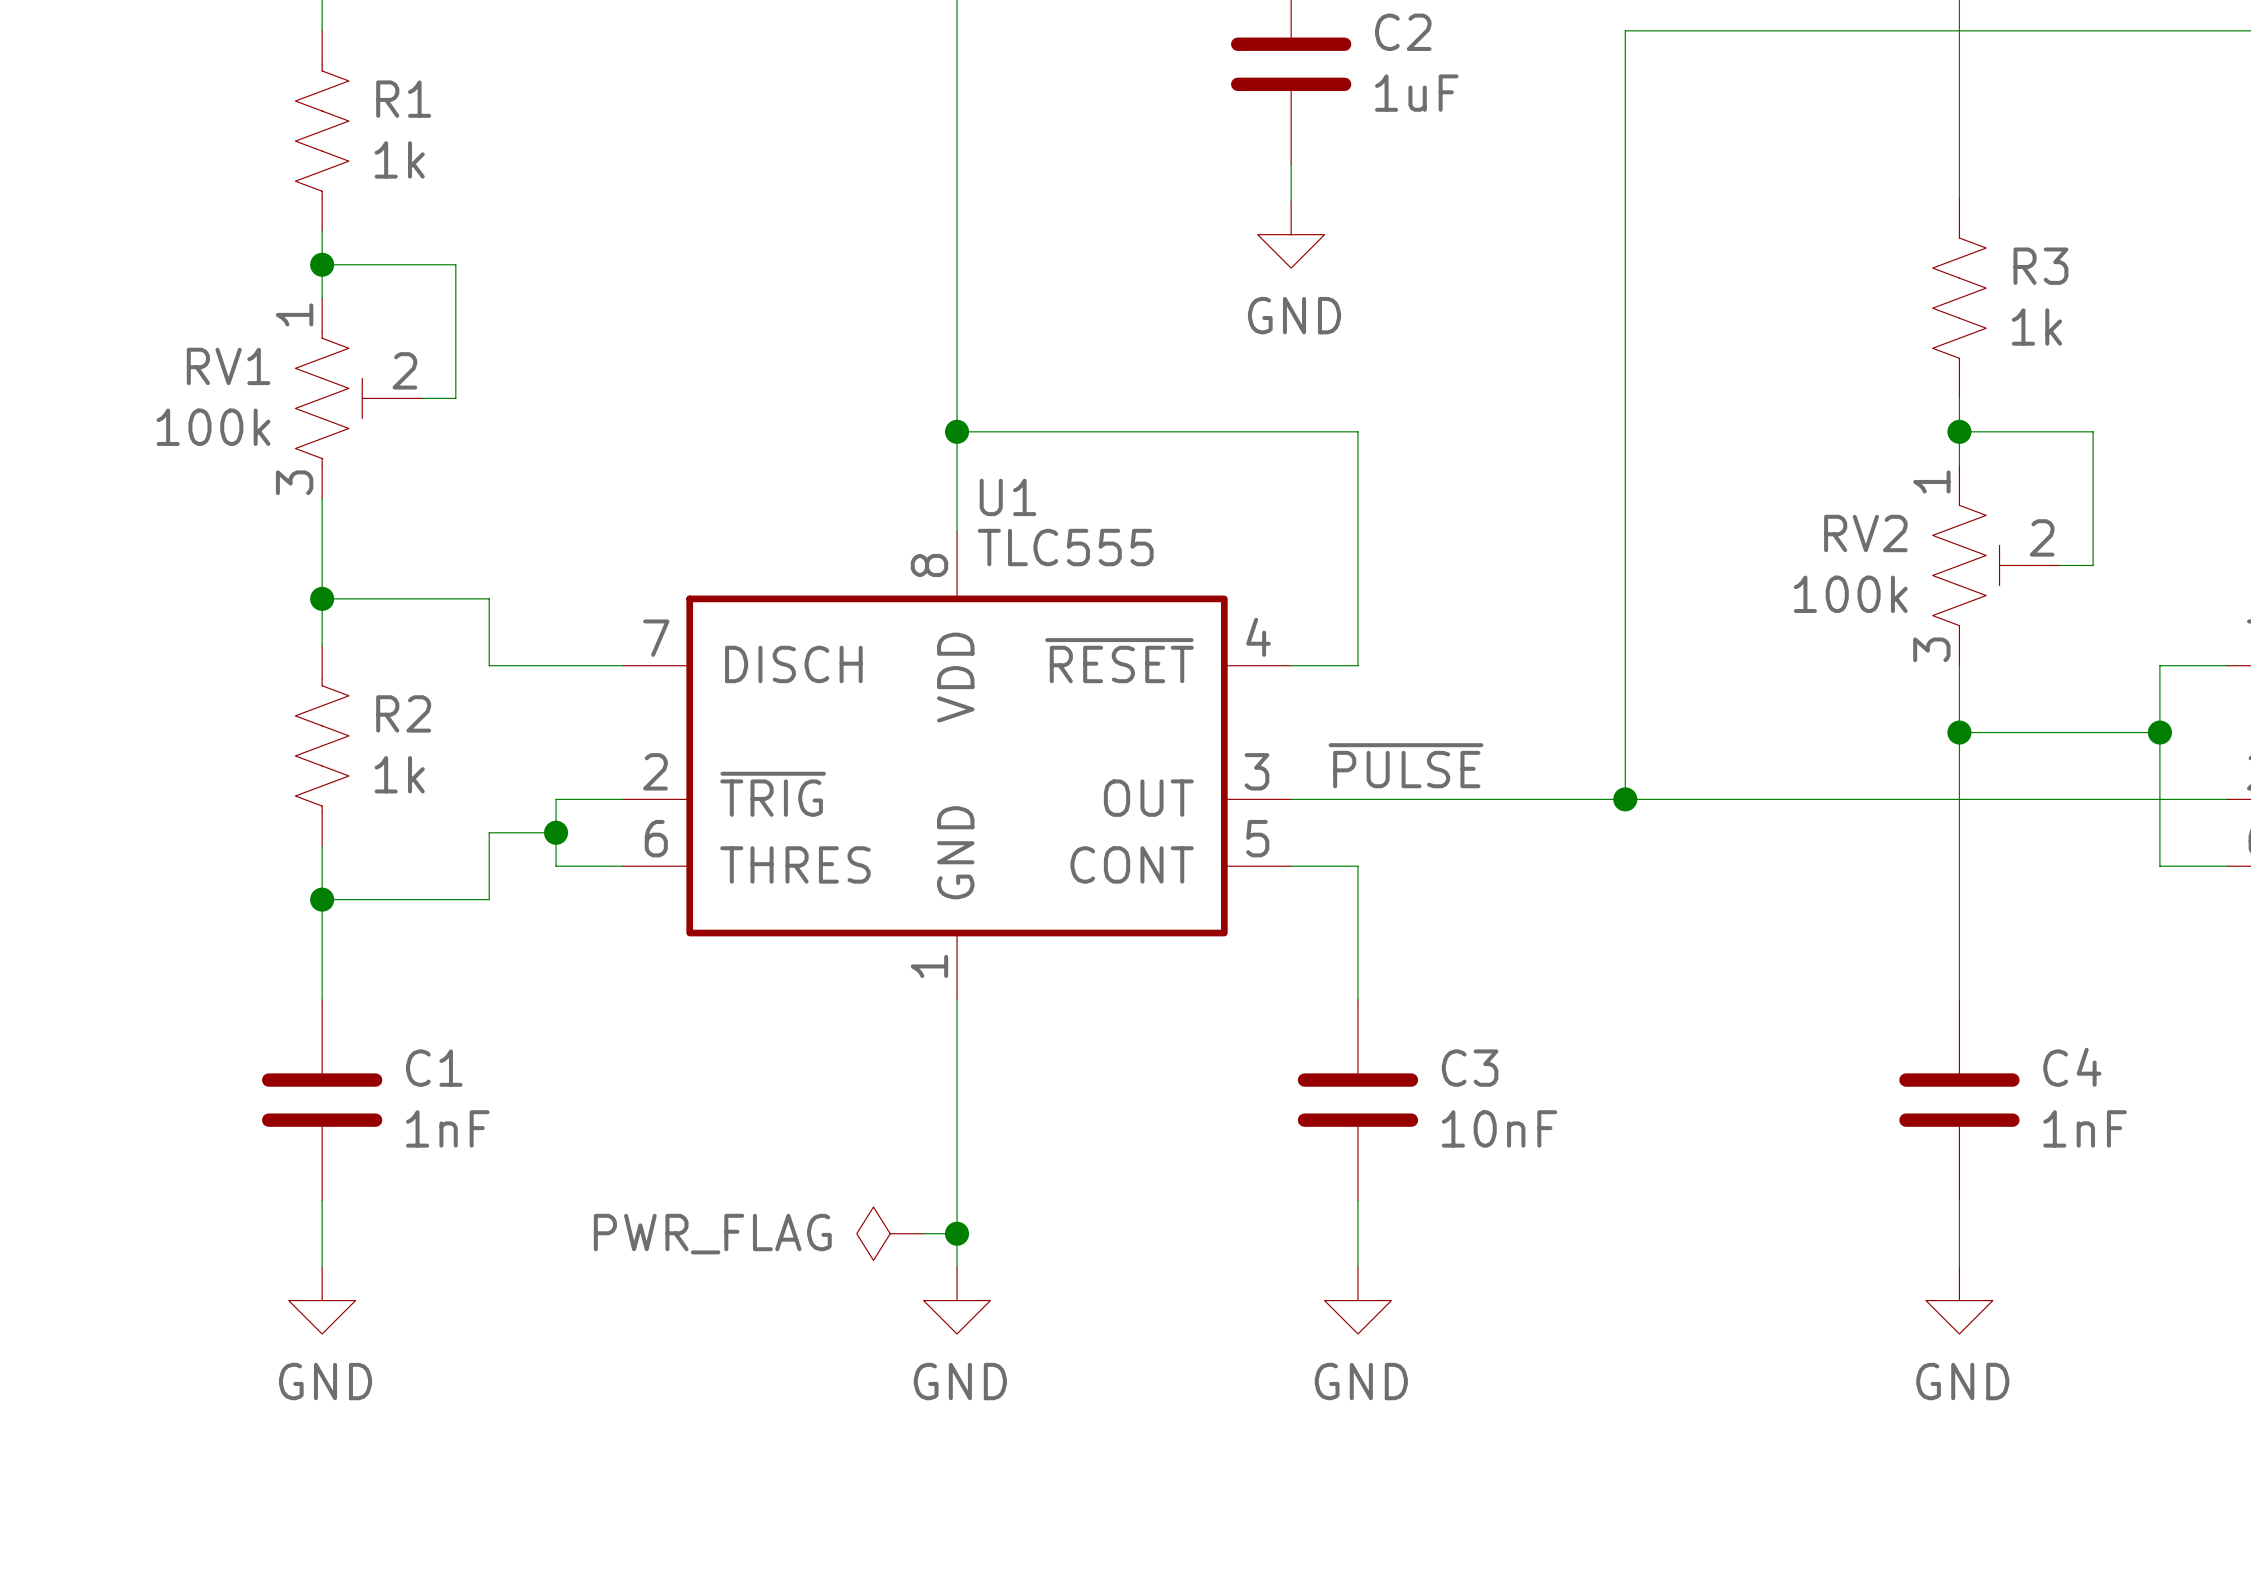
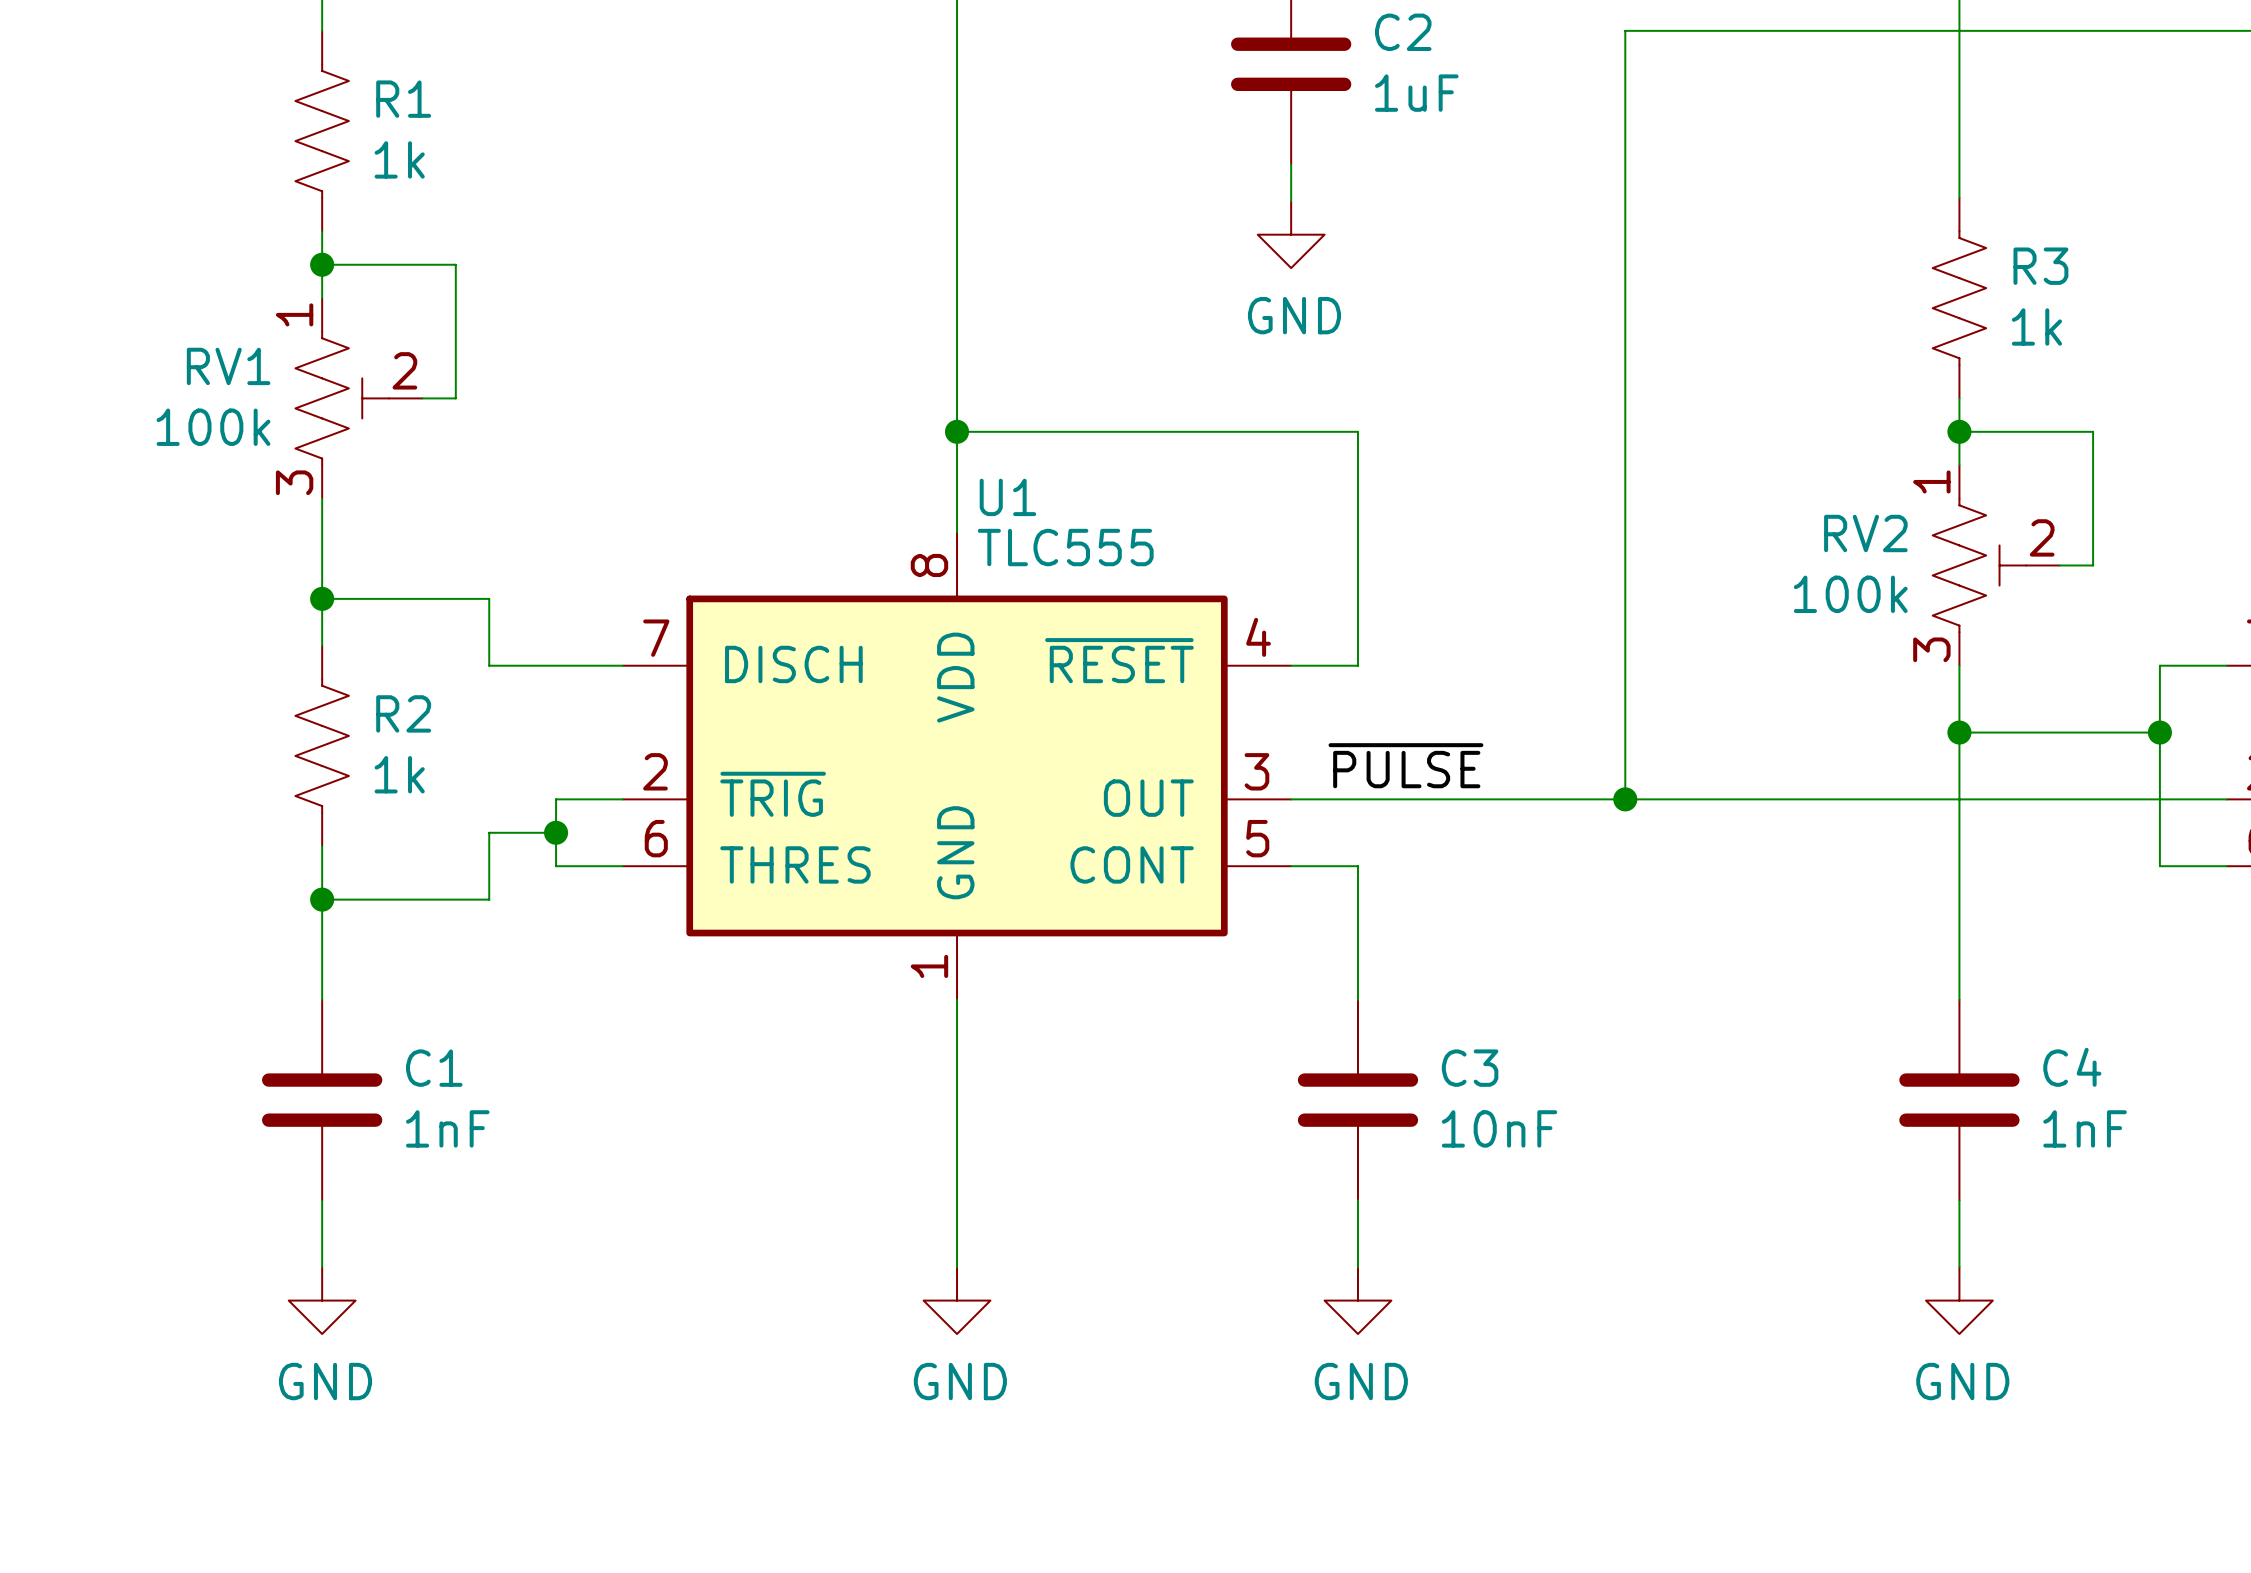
power symbol: PWR_FLAG (890, 1233) -> none
wire: (923, 1233) (957, 1233) -> none
junction: (957, 1233) -> none

